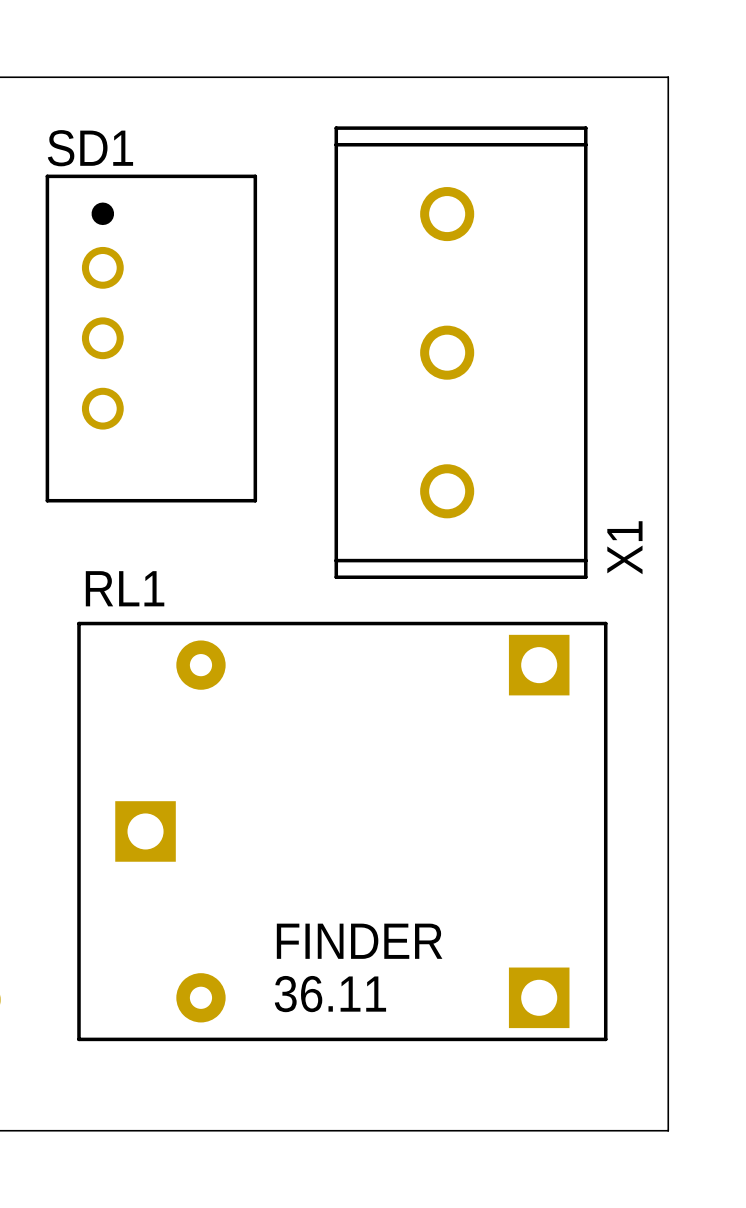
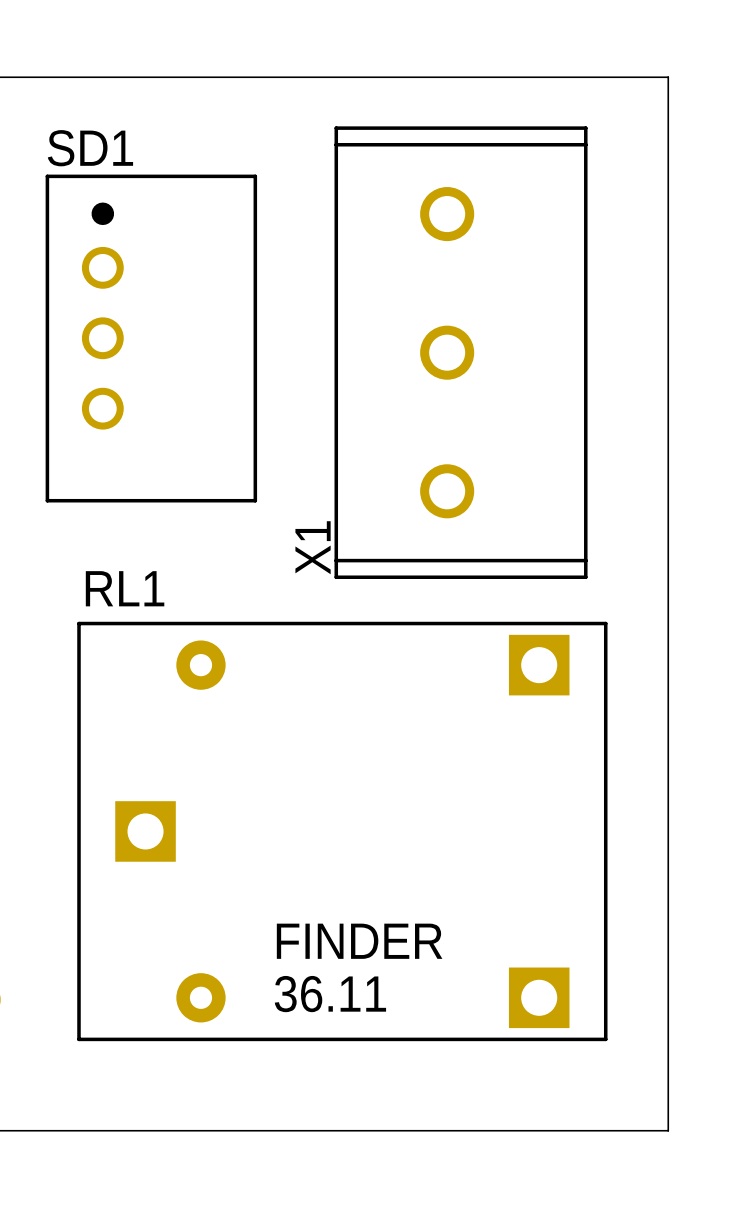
X1 name position: X1 (624, 547) -> X1 (313, 547)

